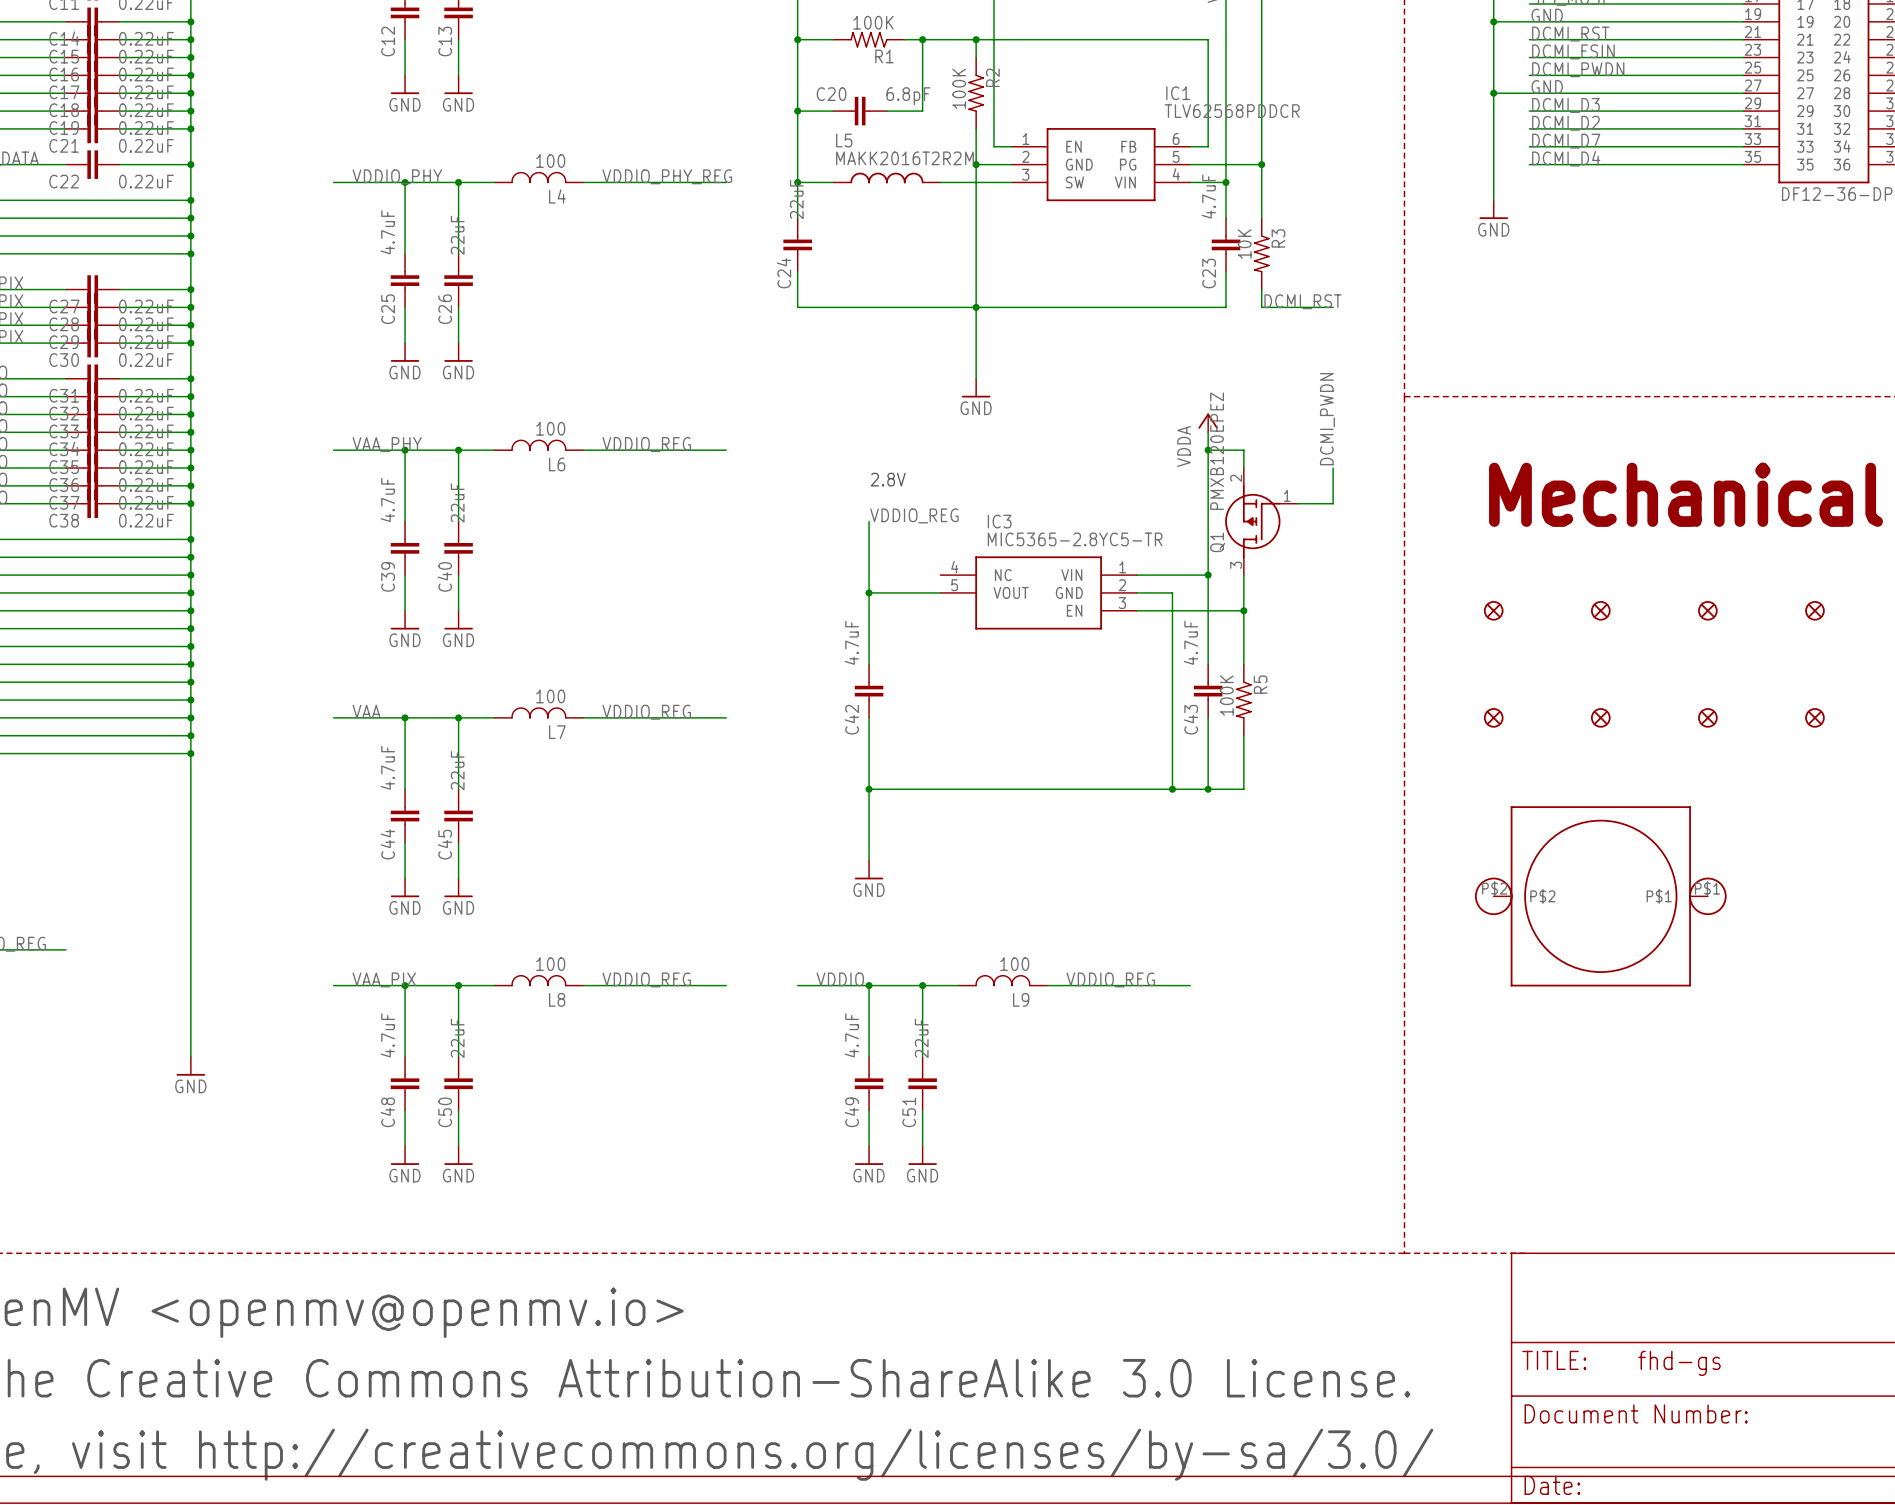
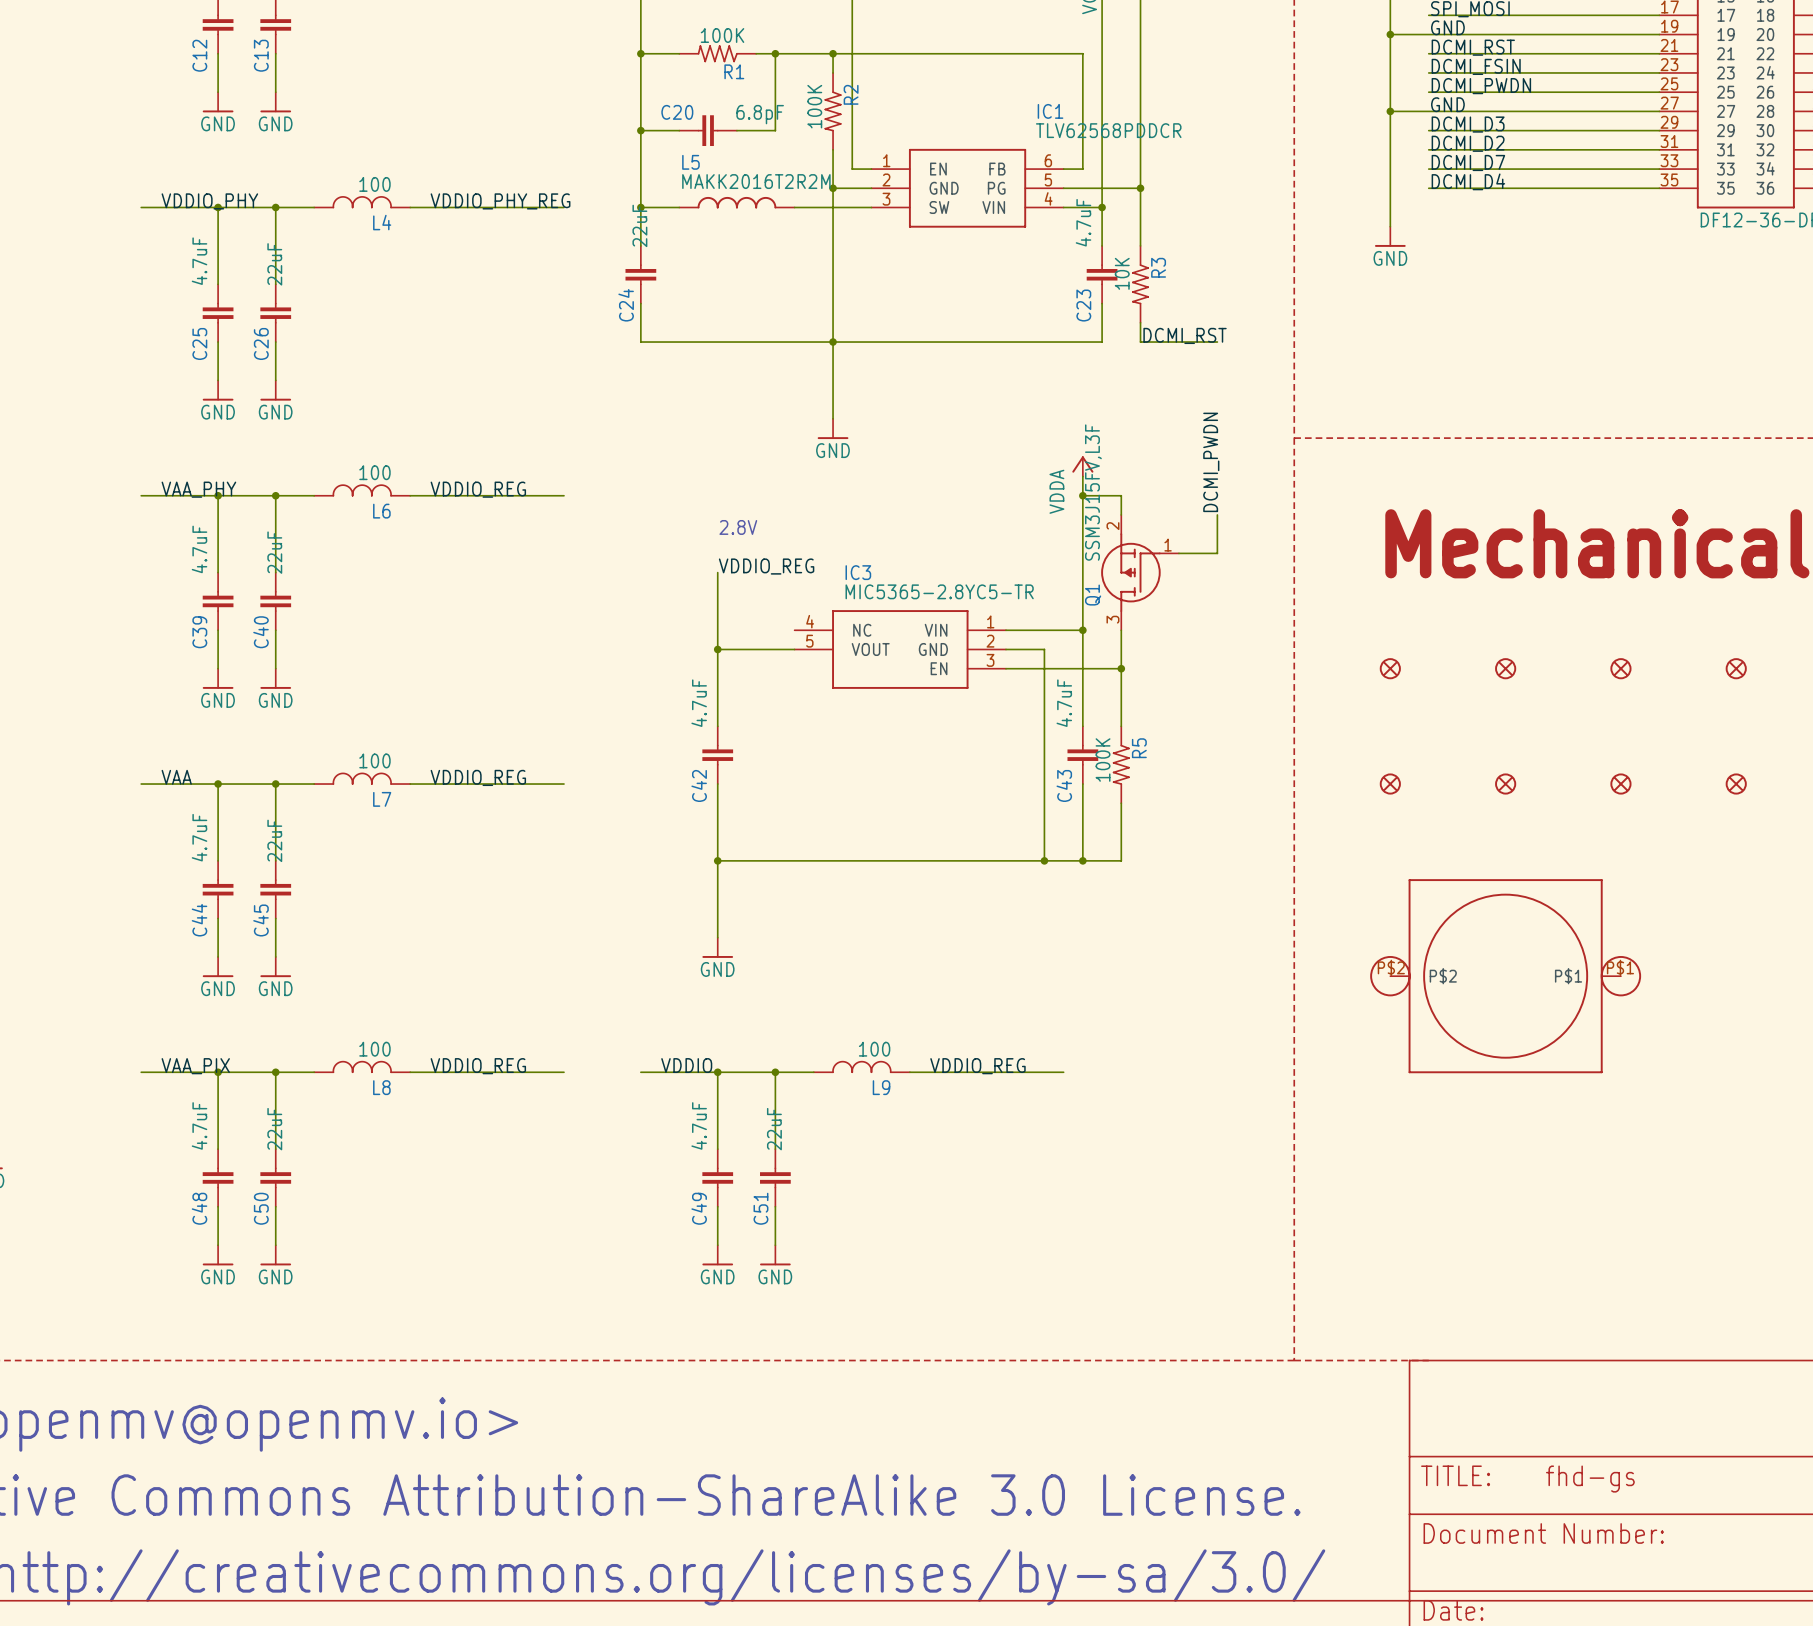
Q1 value: PMXB120EPEZ (1217, 451) -> SSM3J15FV,L3F (1093, 492)

